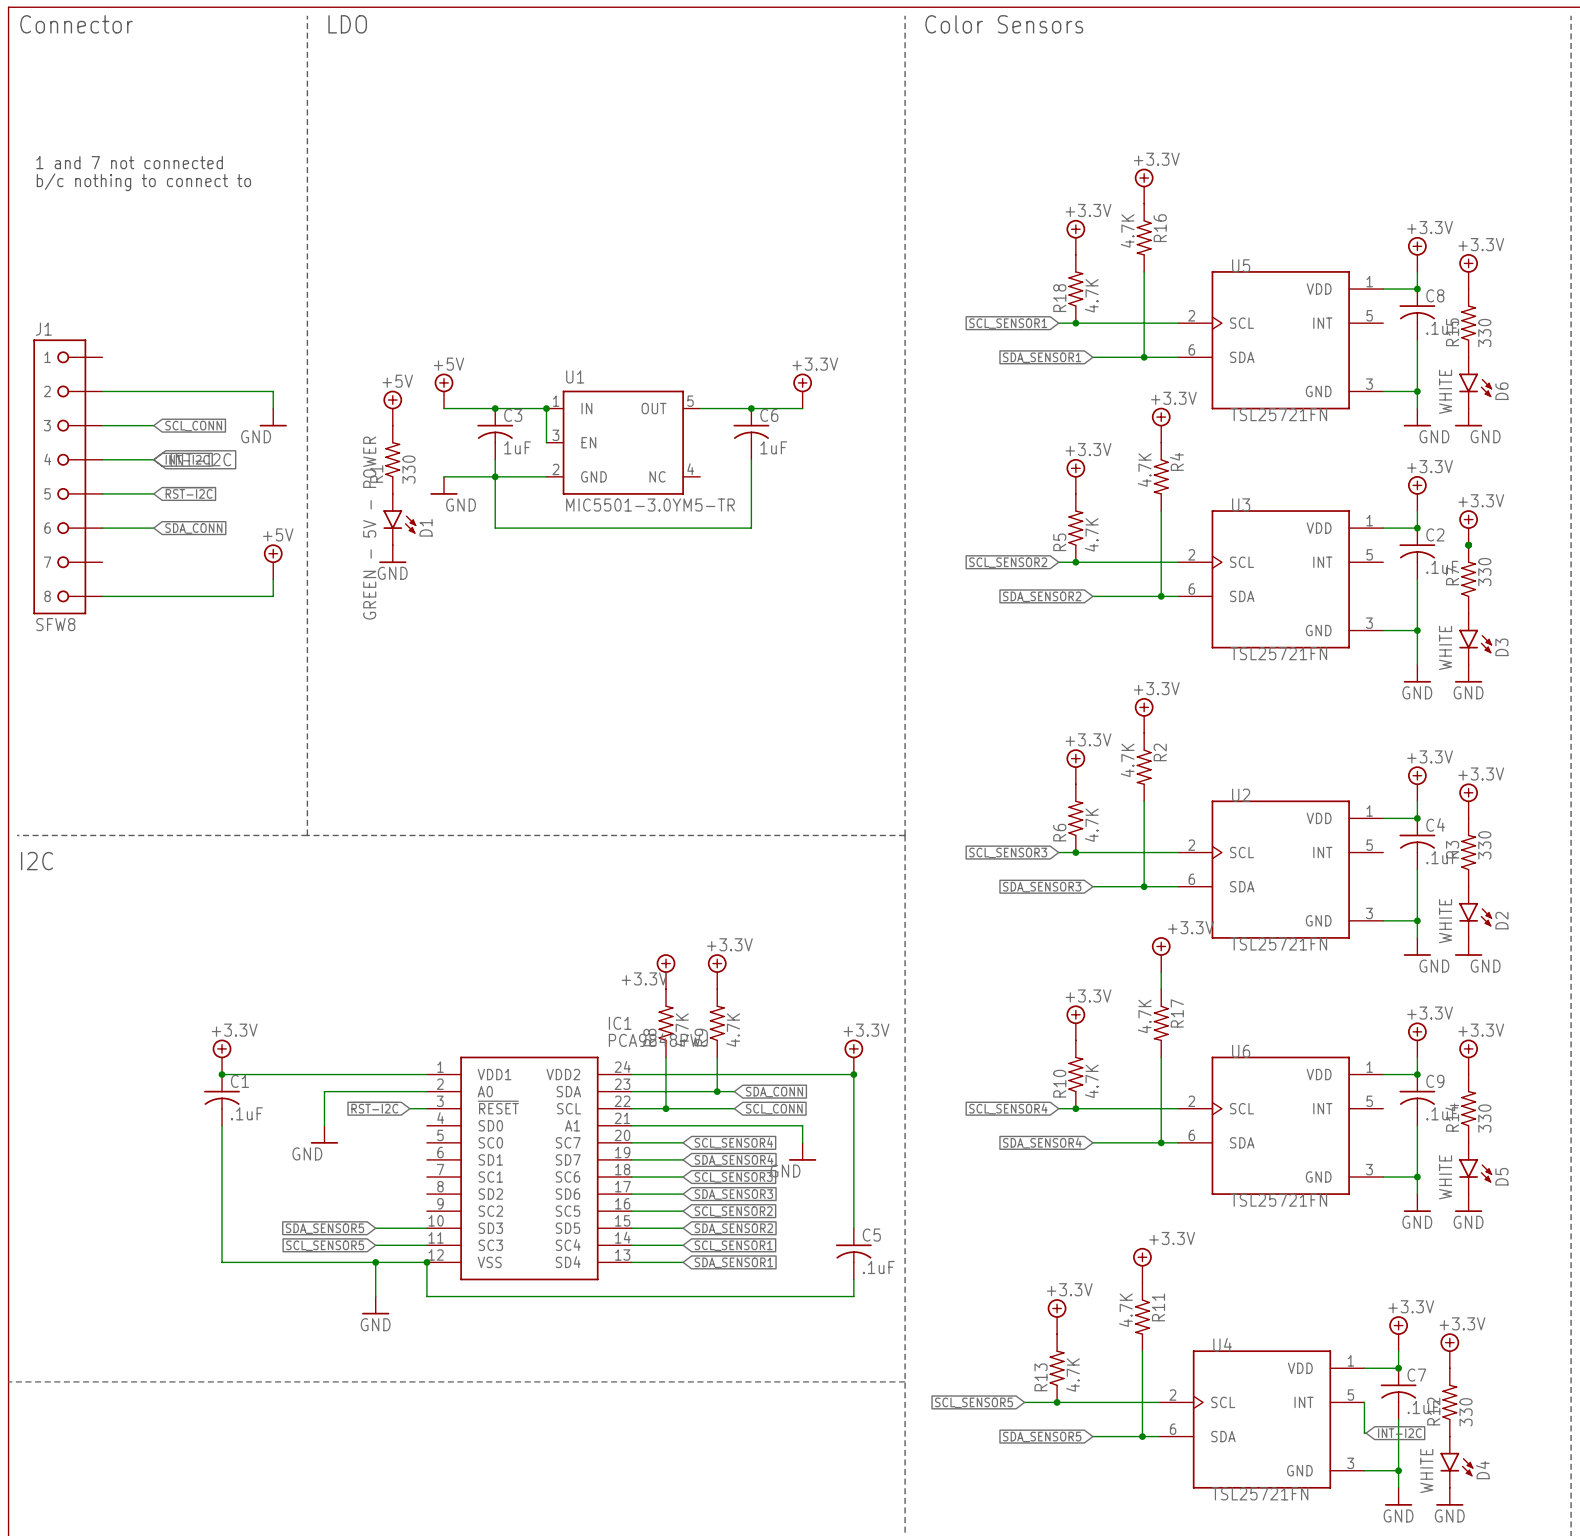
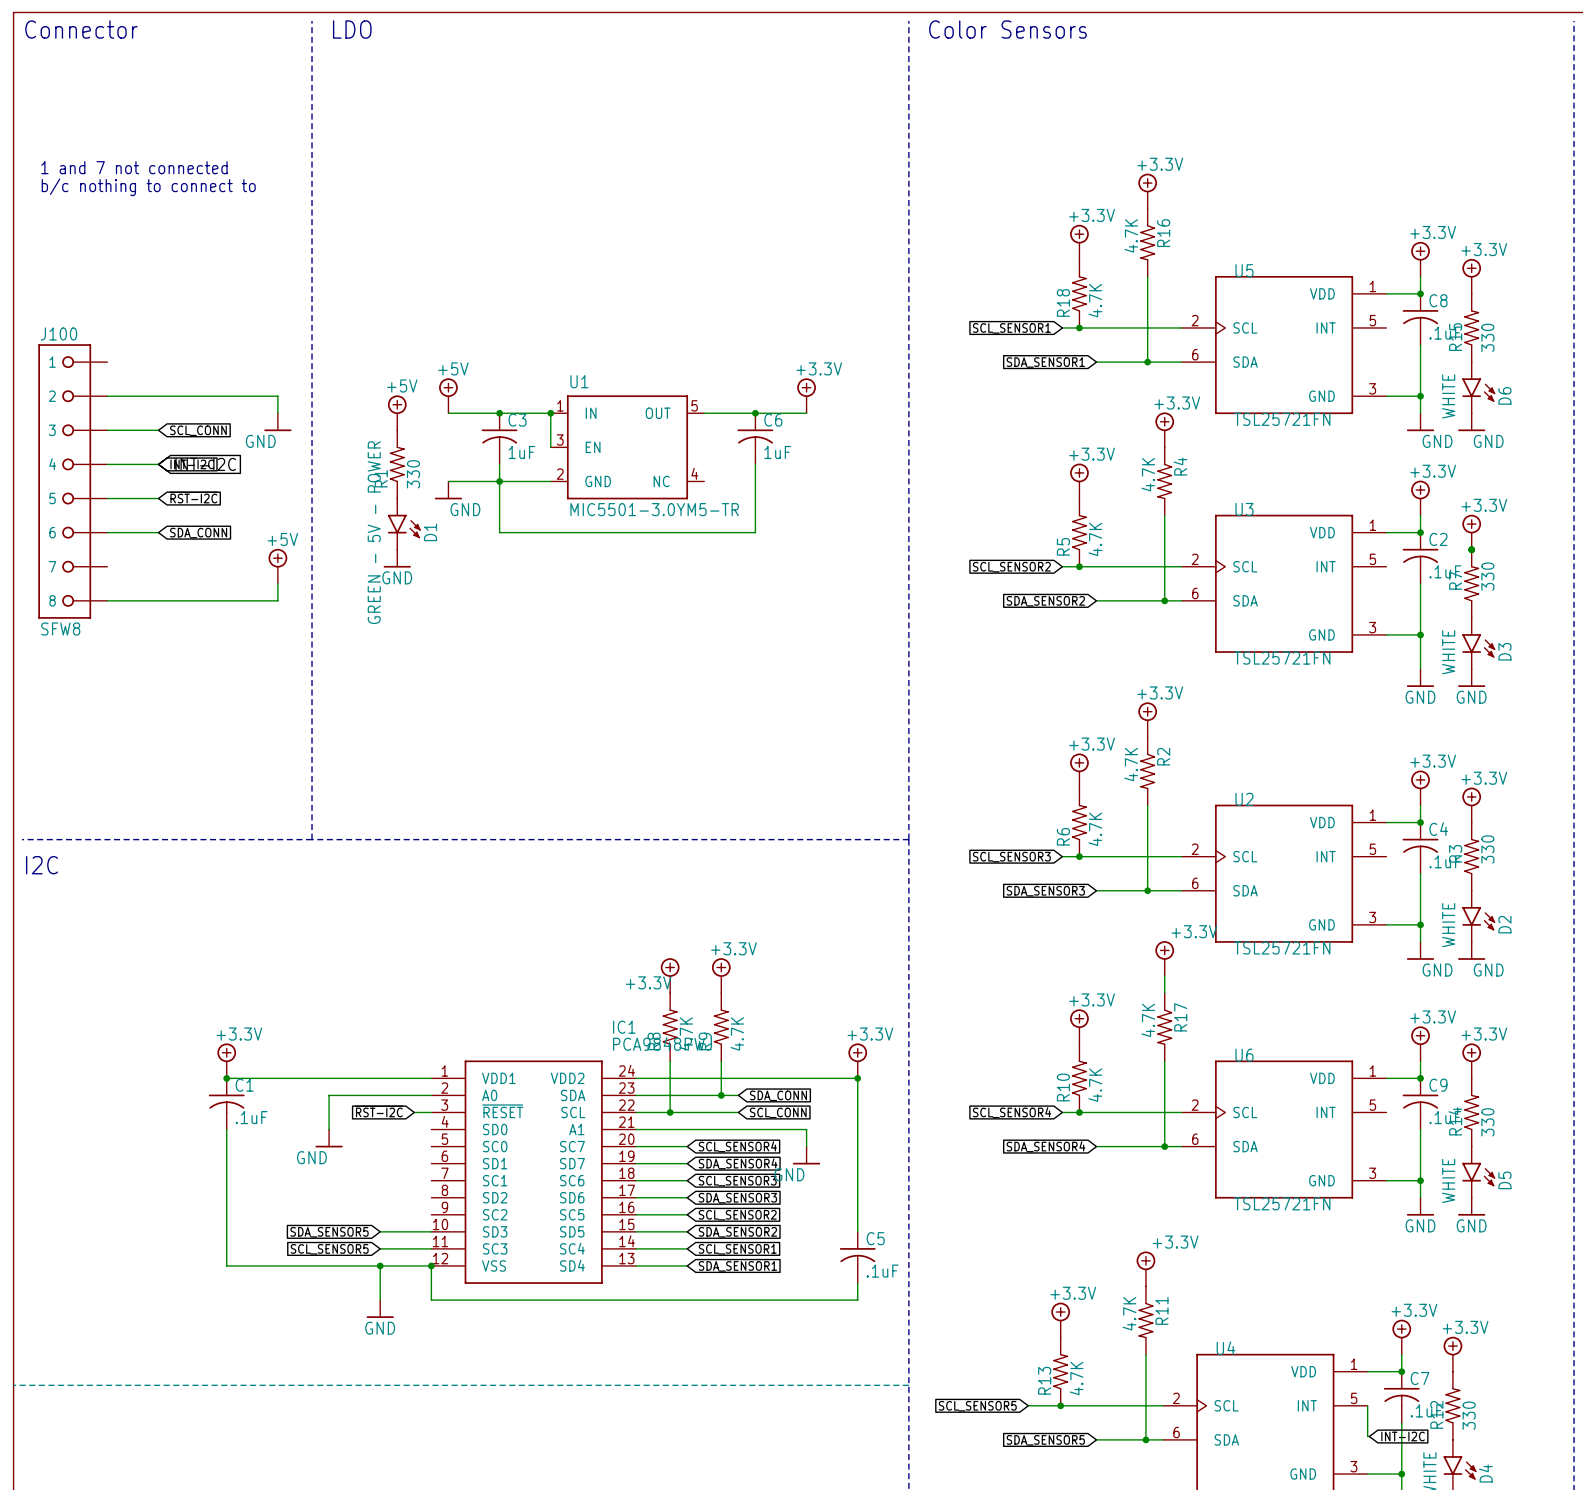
J1 name: J1 (43, 329) -> J100 (58, 333)

